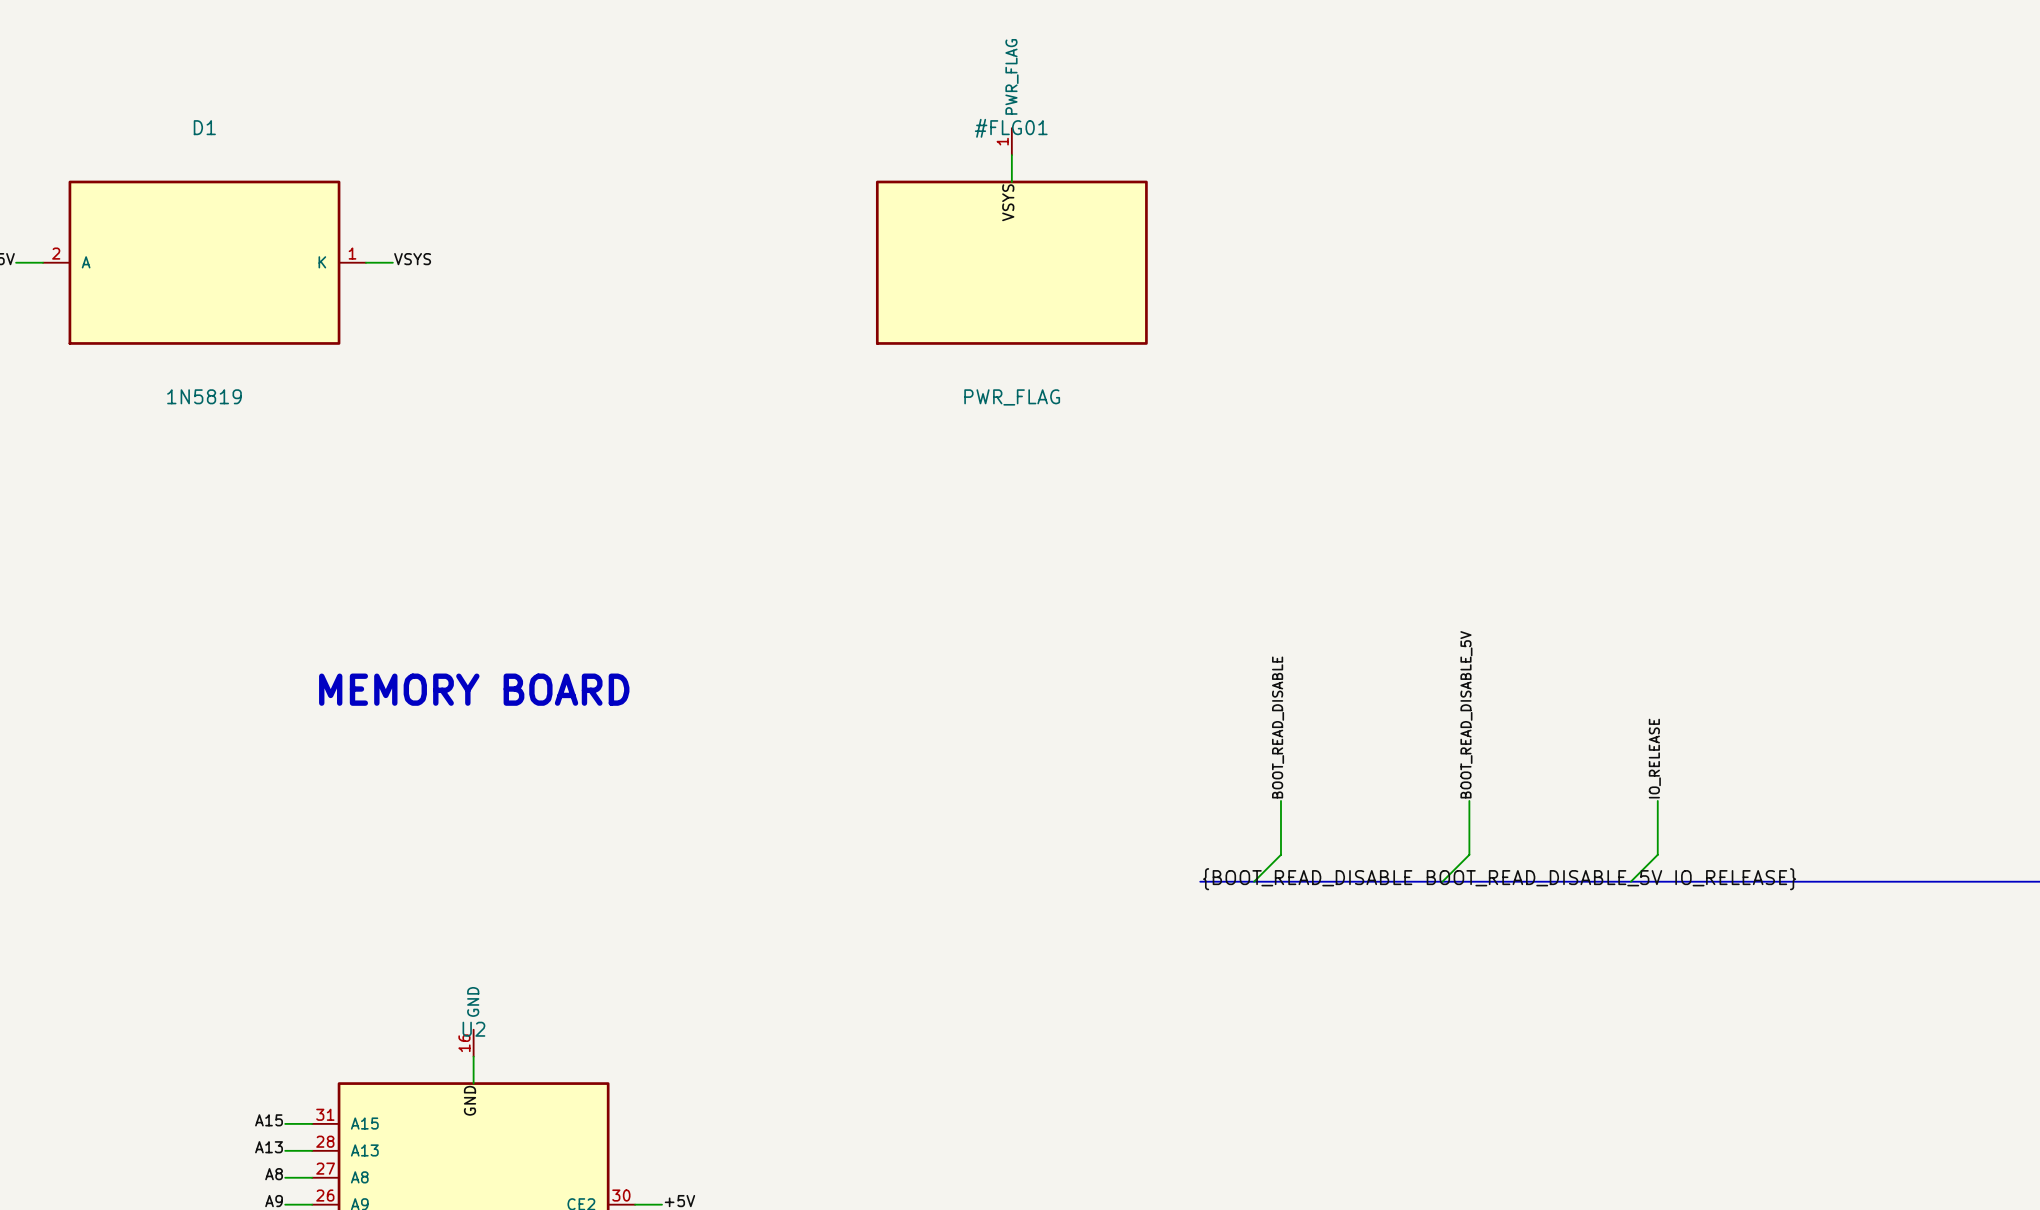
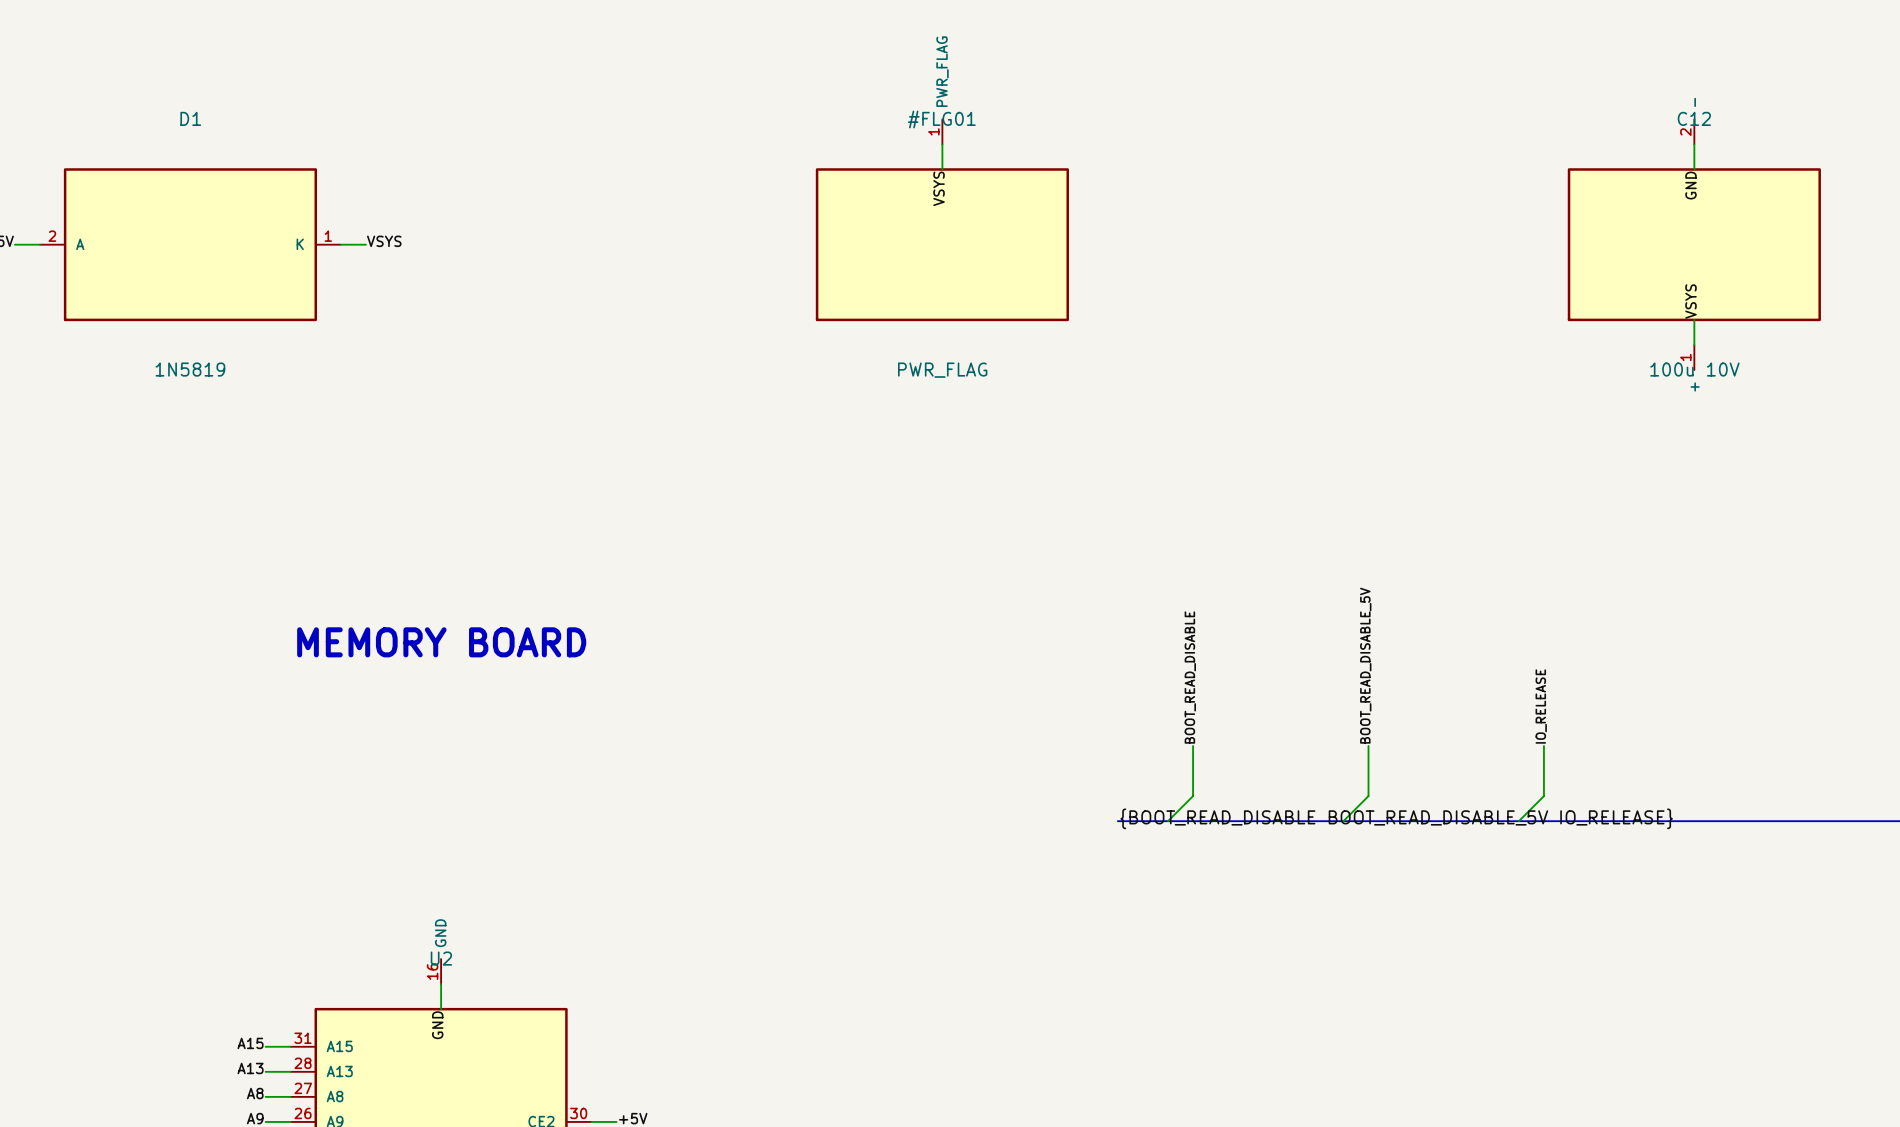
wire: none -> (1694, 144) (1694, 169)
label: none -> GND (1690, 185)
C12: none -> 100u 10V (1694, 244)
label: none -> VSYS (1690, 301)
wire: none -> (1694, 319) (1694, 344)

